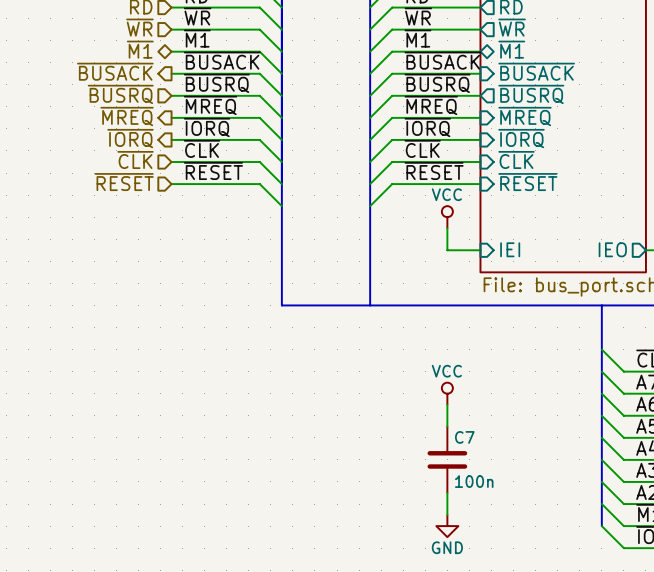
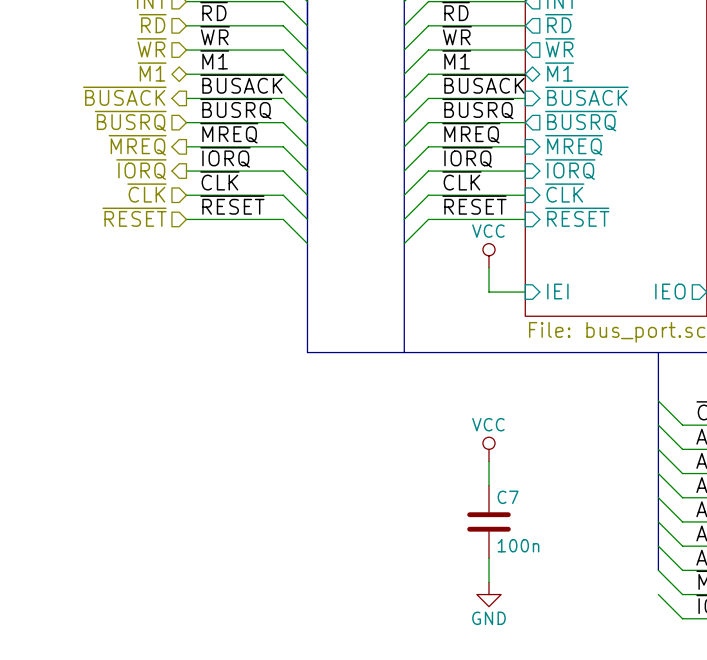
bus: (601, 504) (601, 526) -> none

